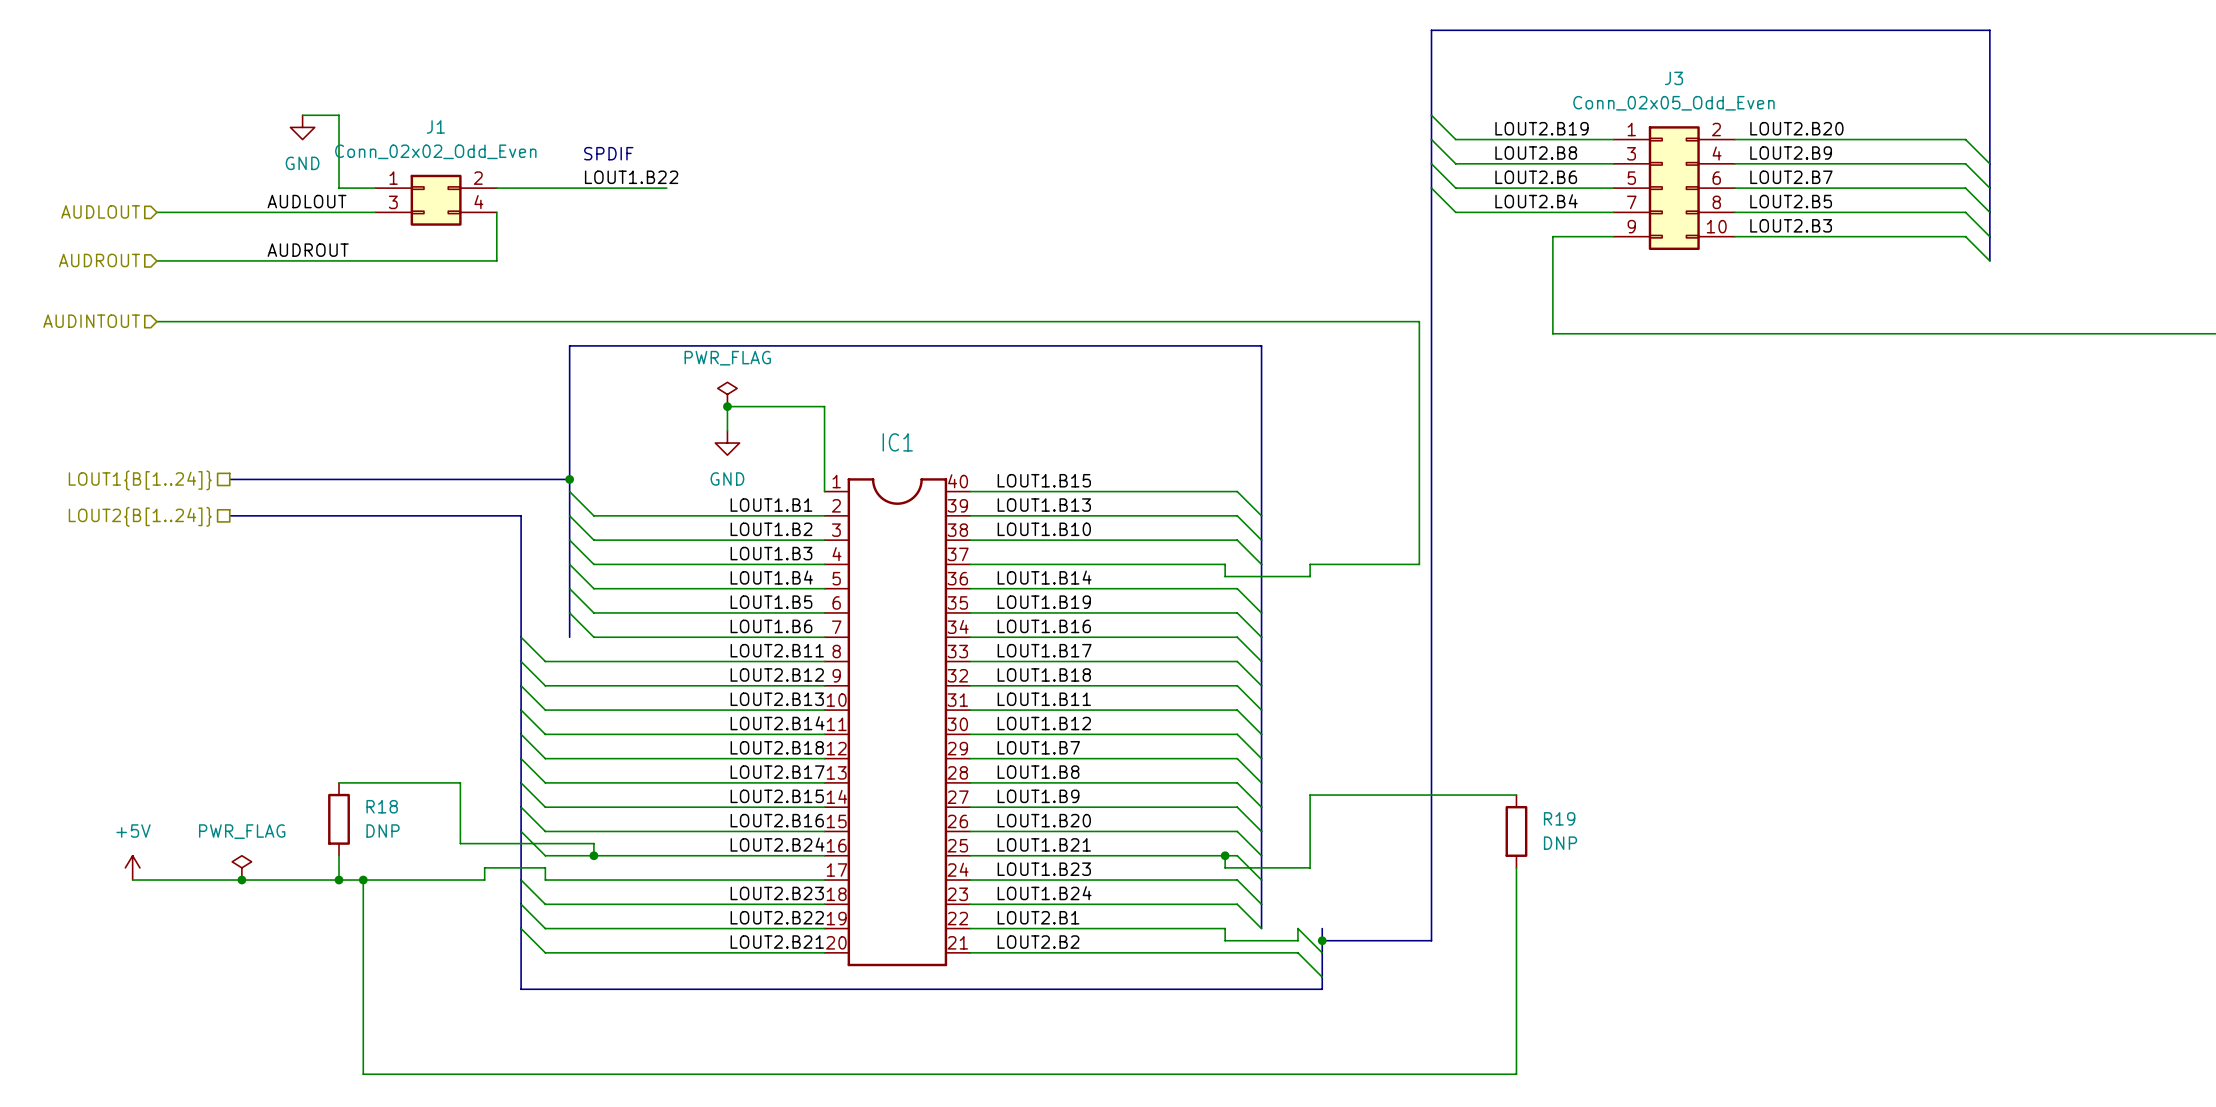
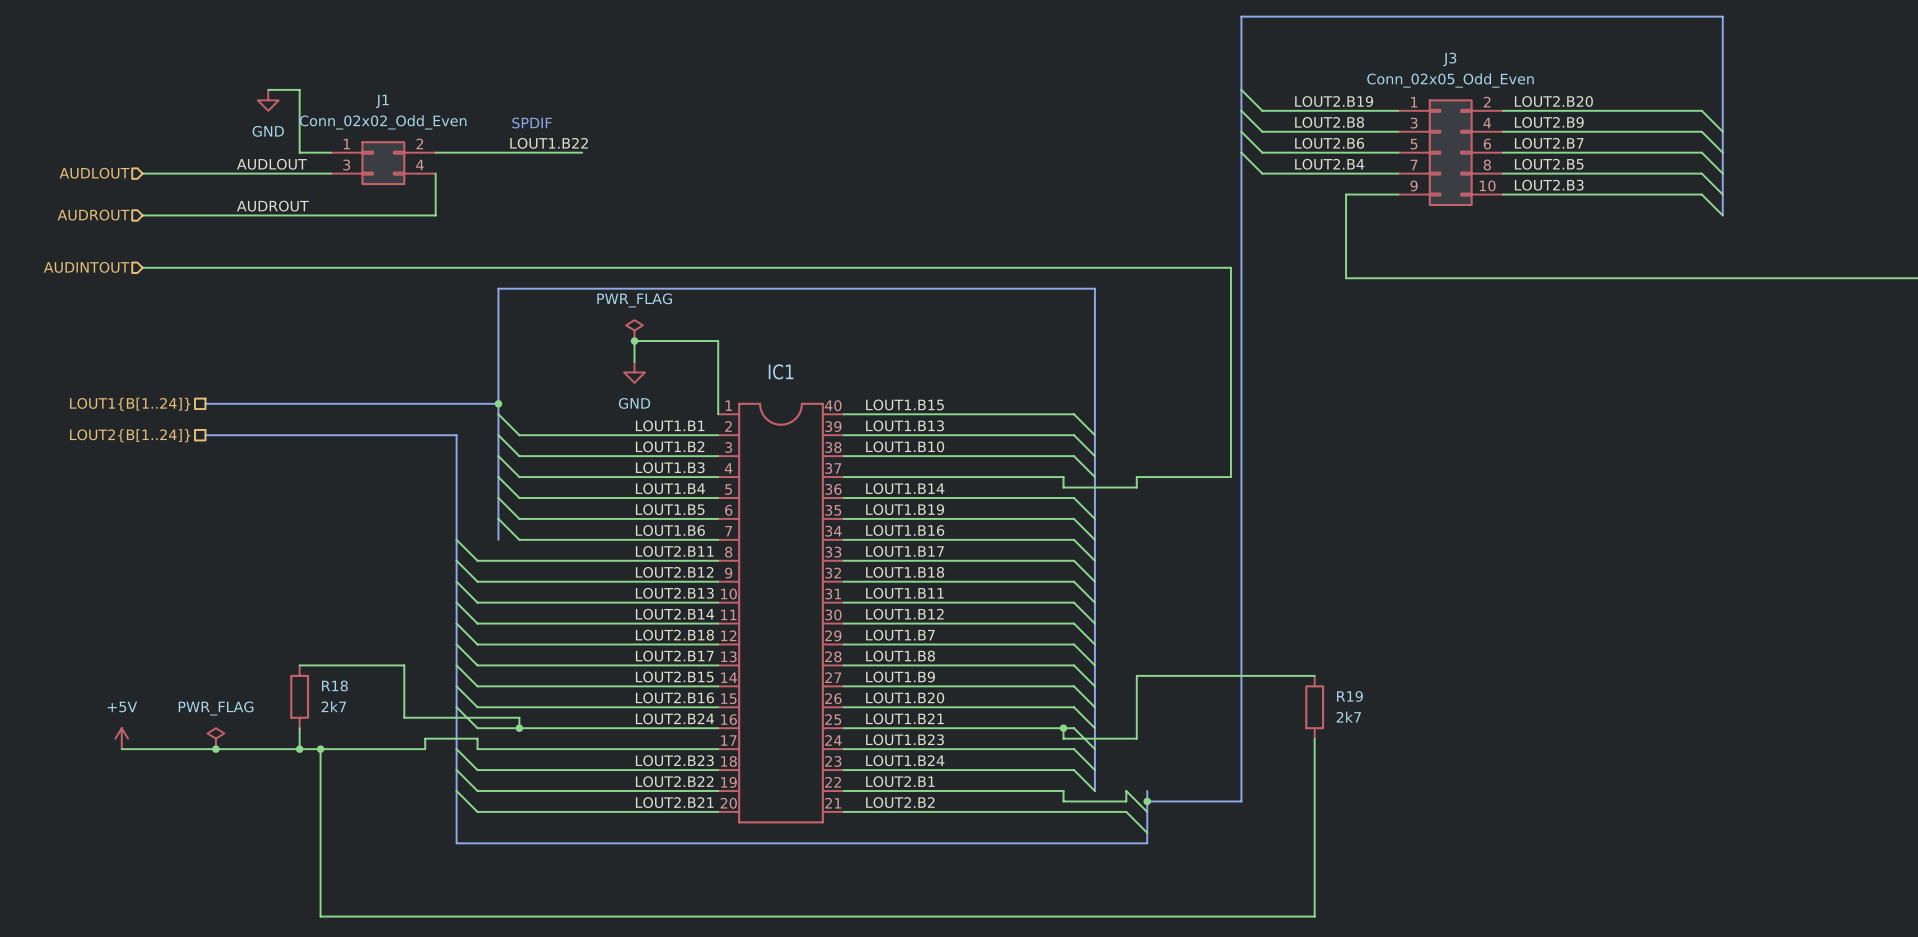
R18 value: DNP (383, 831) -> 2k7 (333, 706)
R19 value: DNP (1560, 843) -> 2k7 (1348, 717)

